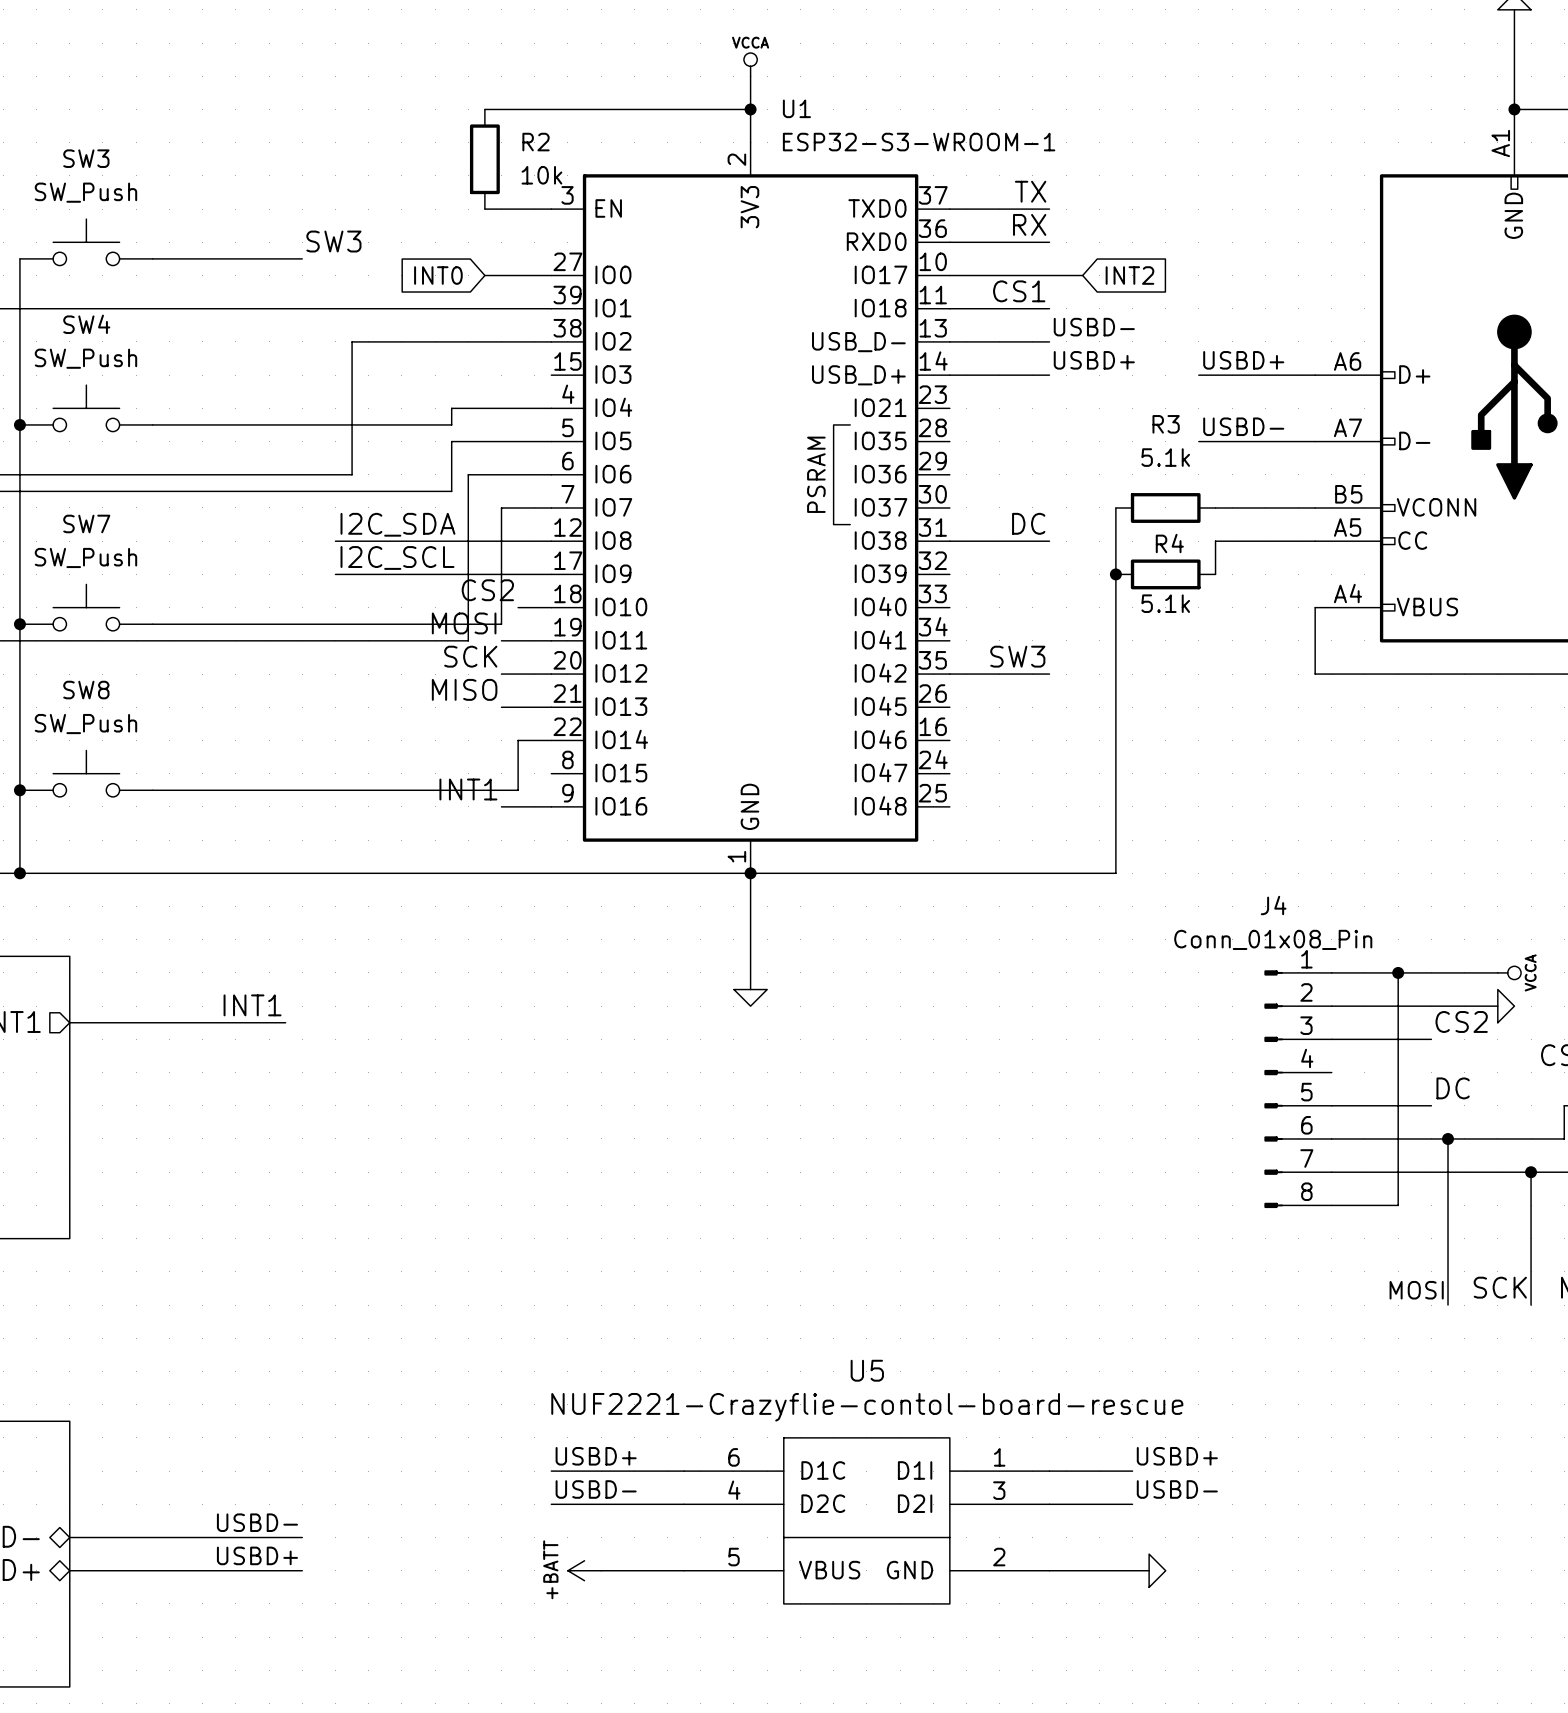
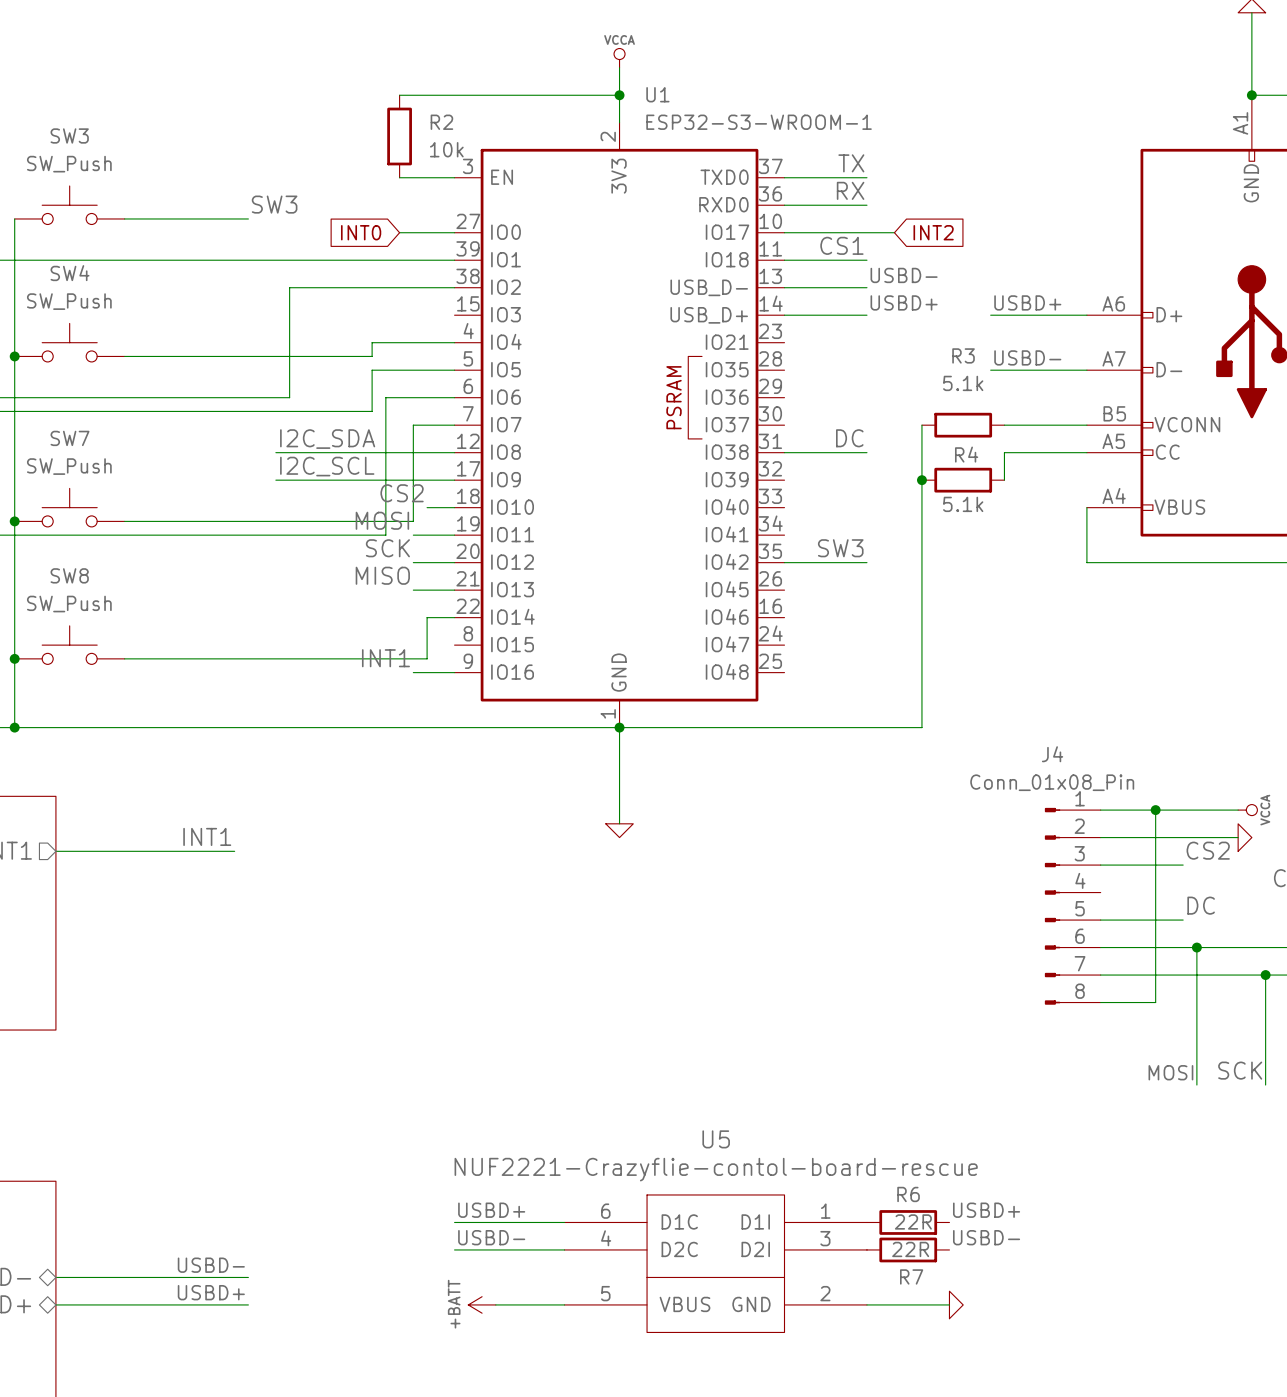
label position: USBD+ (1177, 1456) -> USBD+ (986, 1210)
wire: (1049, 1471) (1132, 1471) -> none
R6: none -> 22R (908, 1222)
label position: USBD- (1177, 1489) -> USBD- (986, 1237)
wire: (1049, 1504) (1132, 1504) -> none
R7: none -> 22R (908, 1249)

